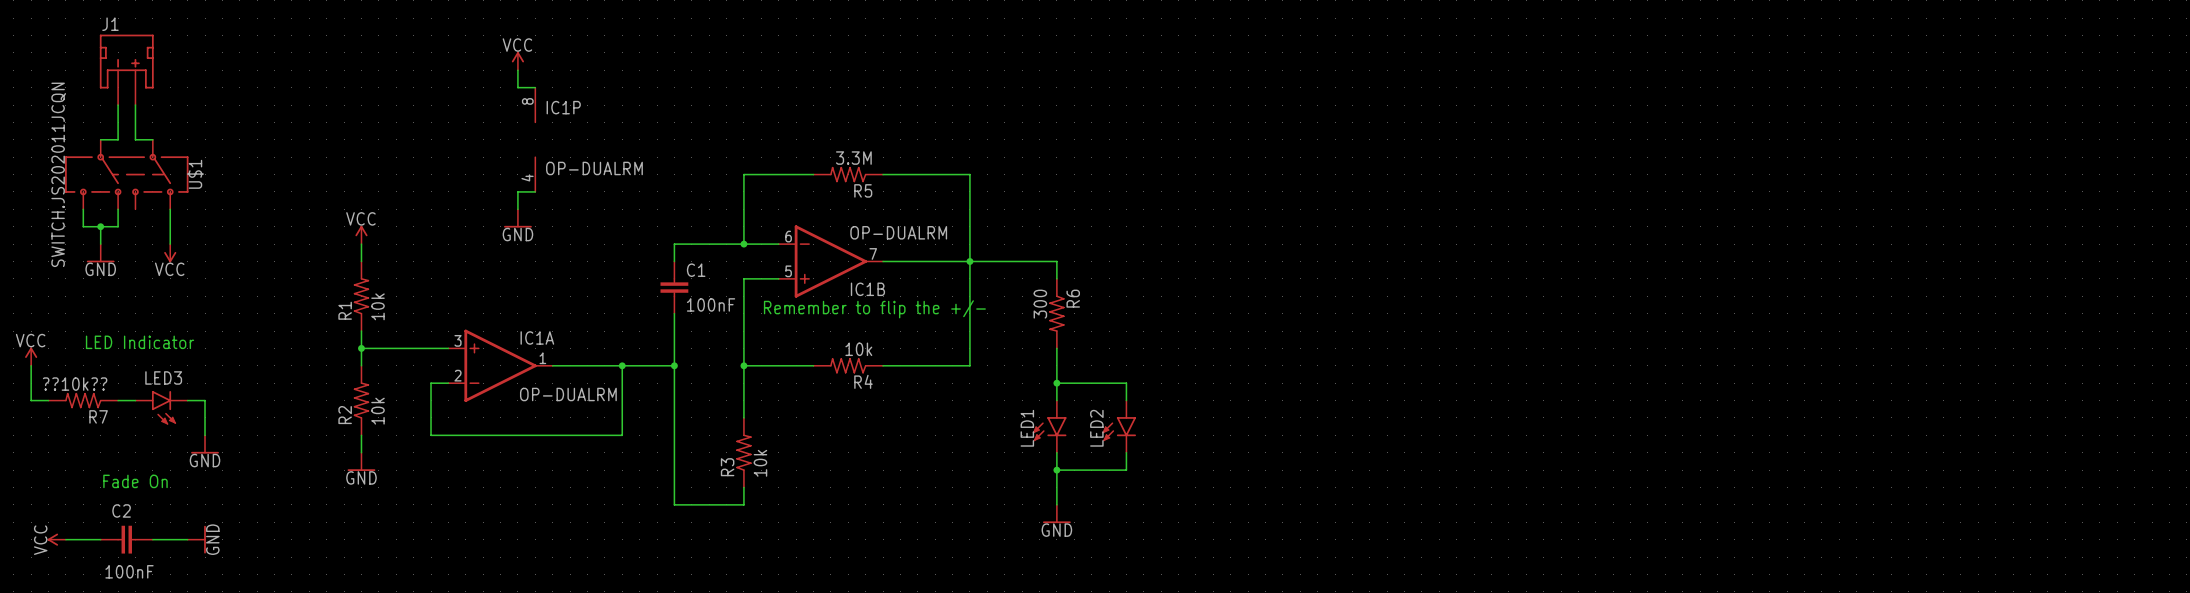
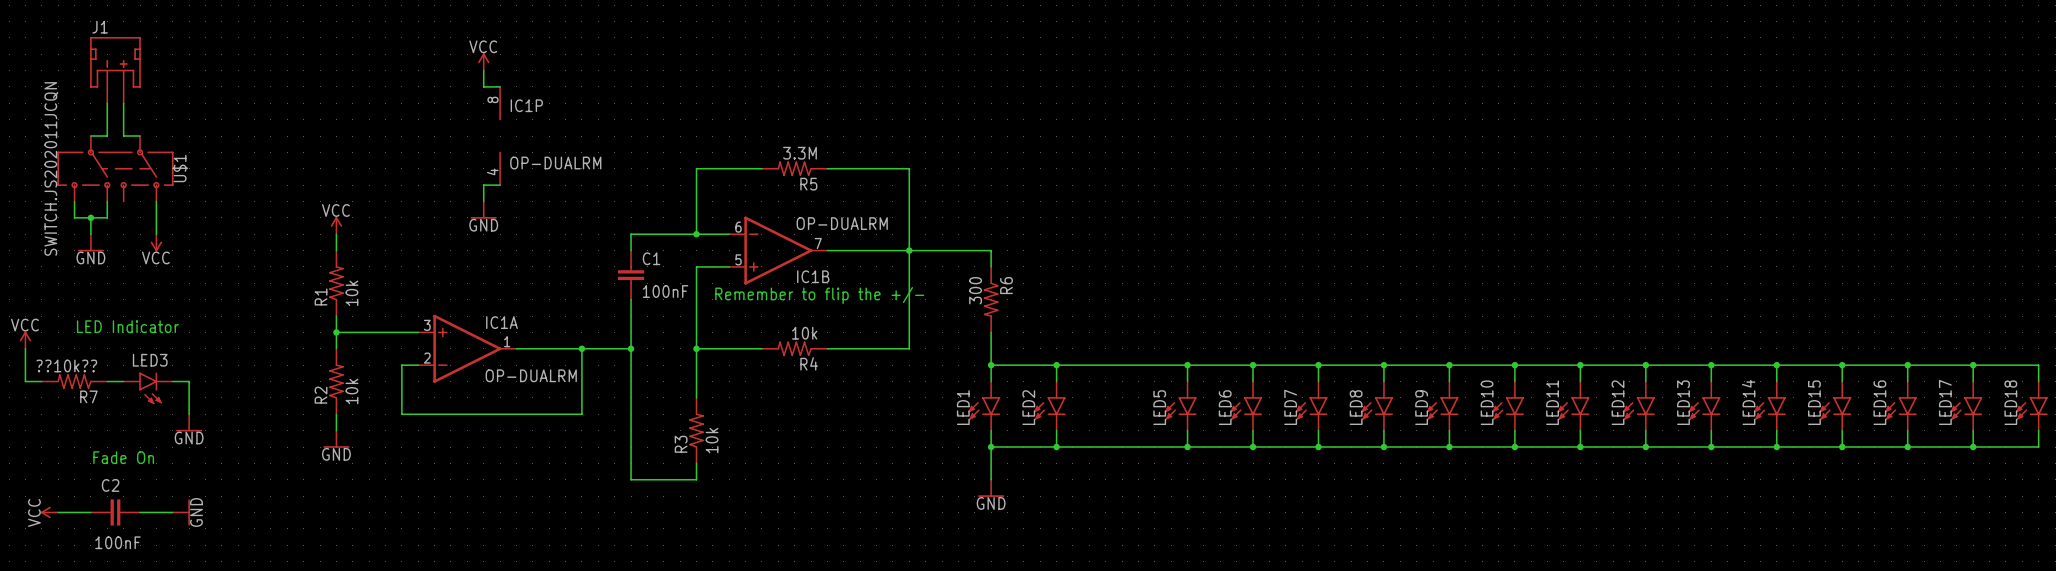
wire: none -> (1056, 365) (2038, 365) (2038, 381)
junction: none -> (1056, 365)
wire: none -> (1187, 365) (1187, 381)
junction: none -> (1187, 365)
wire: none -> (1253, 365) (1253, 381)
junction: none -> (1253, 365)
wire: none -> (1318, 365) (1318, 381)
junction: none -> (1318, 365)
wire: none -> (1383, 365) (1383, 381)
junction: none -> (1383, 365)
wire: none -> (1449, 365) (1449, 381)
junction: none -> (1449, 365)
wire: none -> (1514, 365) (1514, 381)
junction: none -> (1514, 365)
wire: none -> (1580, 365) (1580, 381)
junction: none -> (1580, 365)
wire: none -> (1645, 365) (1645, 381)
junction: none -> (1645, 365)
wire: none -> (1711, 365) (1711, 381)
junction: none -> (1711, 365)
wire: none -> (1776, 365) (1776, 381)
junction: none -> (1776, 365)
wire: none -> (1842, 365) (1842, 381)
junction: none -> (1842, 365)
wire: none -> (1907, 365) (1907, 381)
junction: none -> (1907, 365)
wire: none -> (1973, 365) (1973, 381)
junction: none -> (1973, 365)
LED5: none -> (1180, 406)
LED6: none -> (1246, 406)
LED7: none -> (1311, 406)
LED8: none -> (1377, 406)
LED9: none -> (1442, 406)
LED10: none -> (1508, 406)
LED11: none -> (1573, 406)
LED12: none -> (1639, 406)
LED13: none -> (1704, 406)
LED14: none -> (1769, 406)
LED15: none -> (1835, 406)
LED16: none -> (1900, 406)
LED17: none -> (1966, 406)
LED18: none -> (2031, 406)
wire: none -> (1187, 430) (1187, 447)
wire: none -> (1253, 430) (1253, 447)
wire: none -> (1318, 430) (1318, 447)
wire: none -> (1383, 430) (1383, 447)
wire: none -> (1449, 430) (1449, 447)
wire: none -> (1514, 430) (1514, 447)
wire: none -> (1580, 430) (1580, 447)
wire: none -> (1645, 430) (1645, 447)
wire: none -> (1711, 430) (1711, 447)
wire: none -> (1776, 430) (1776, 447)
wire: none -> (1842, 430) (1842, 447)
wire: none -> (1907, 430) (1907, 447)
wire: none -> (1973, 430) (1973, 447)
wire: none -> (2038, 430) (2038, 447) (1056, 447)
junction: none -> (1056, 447)
junction: none -> (1187, 447)
junction: none -> (1253, 447)
junction: none -> (1318, 447)
junction: none -> (1383, 447)
junction: none -> (1449, 447)
junction: none -> (1514, 447)
junction: none -> (1580, 447)
junction: none -> (1645, 447)
junction: none -> (1711, 447)
junction: none -> (1776, 447)
junction: none -> (1842, 447)
junction: none -> (1907, 447)
junction: none -> (1973, 447)

